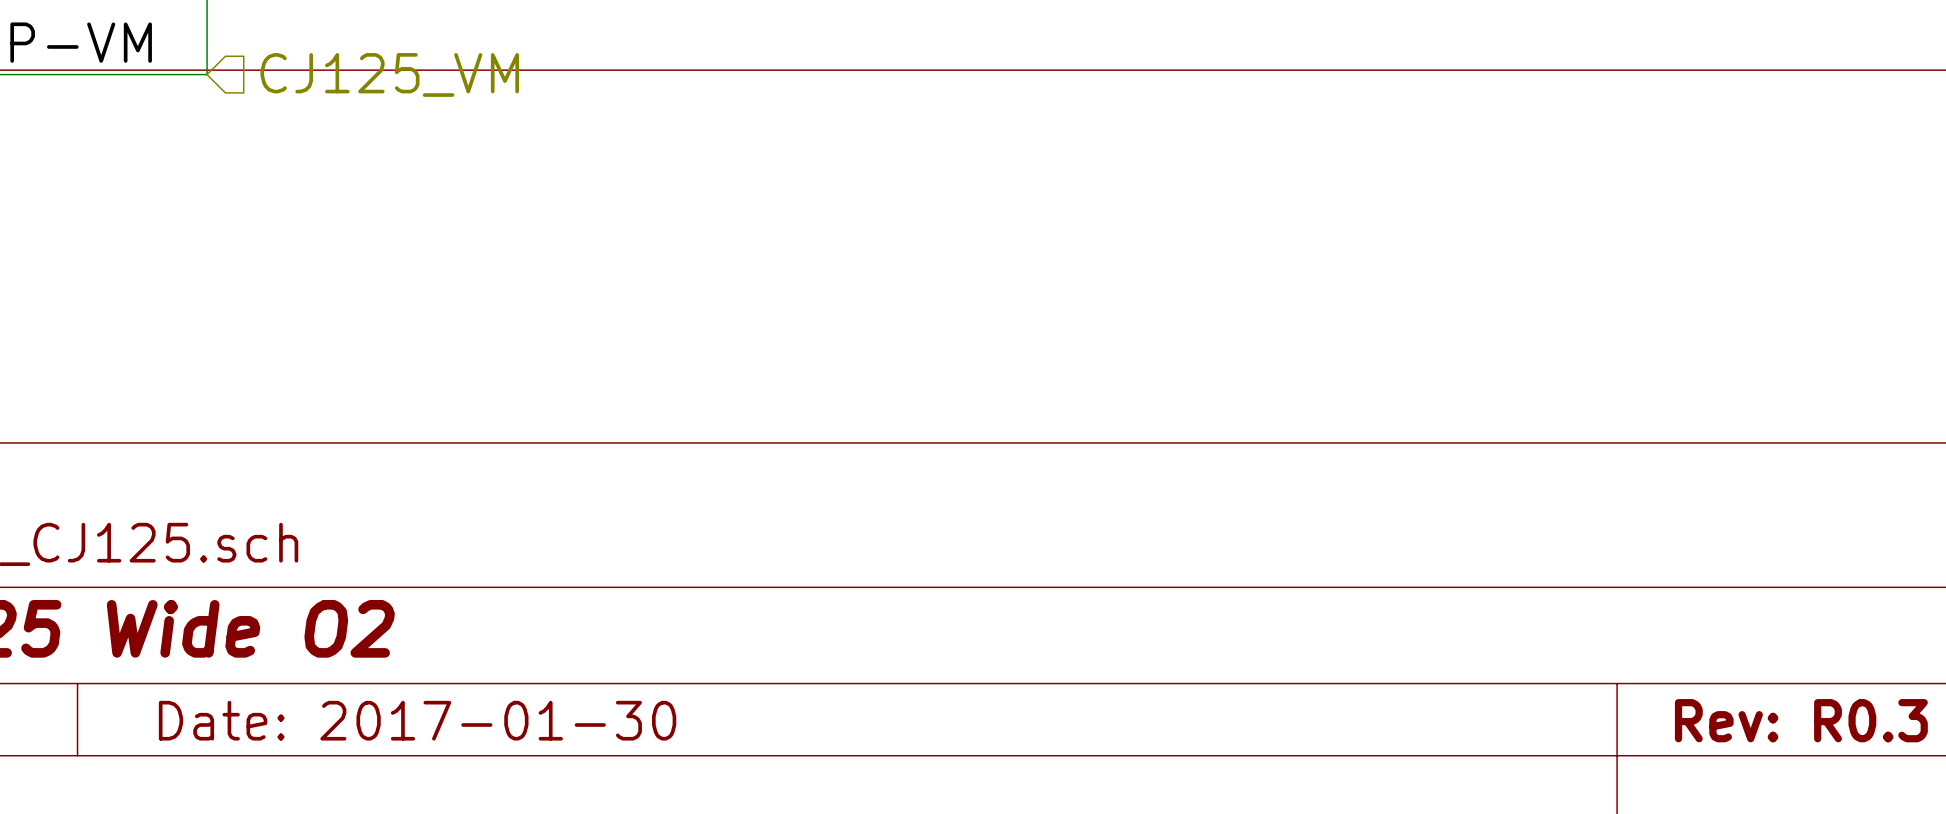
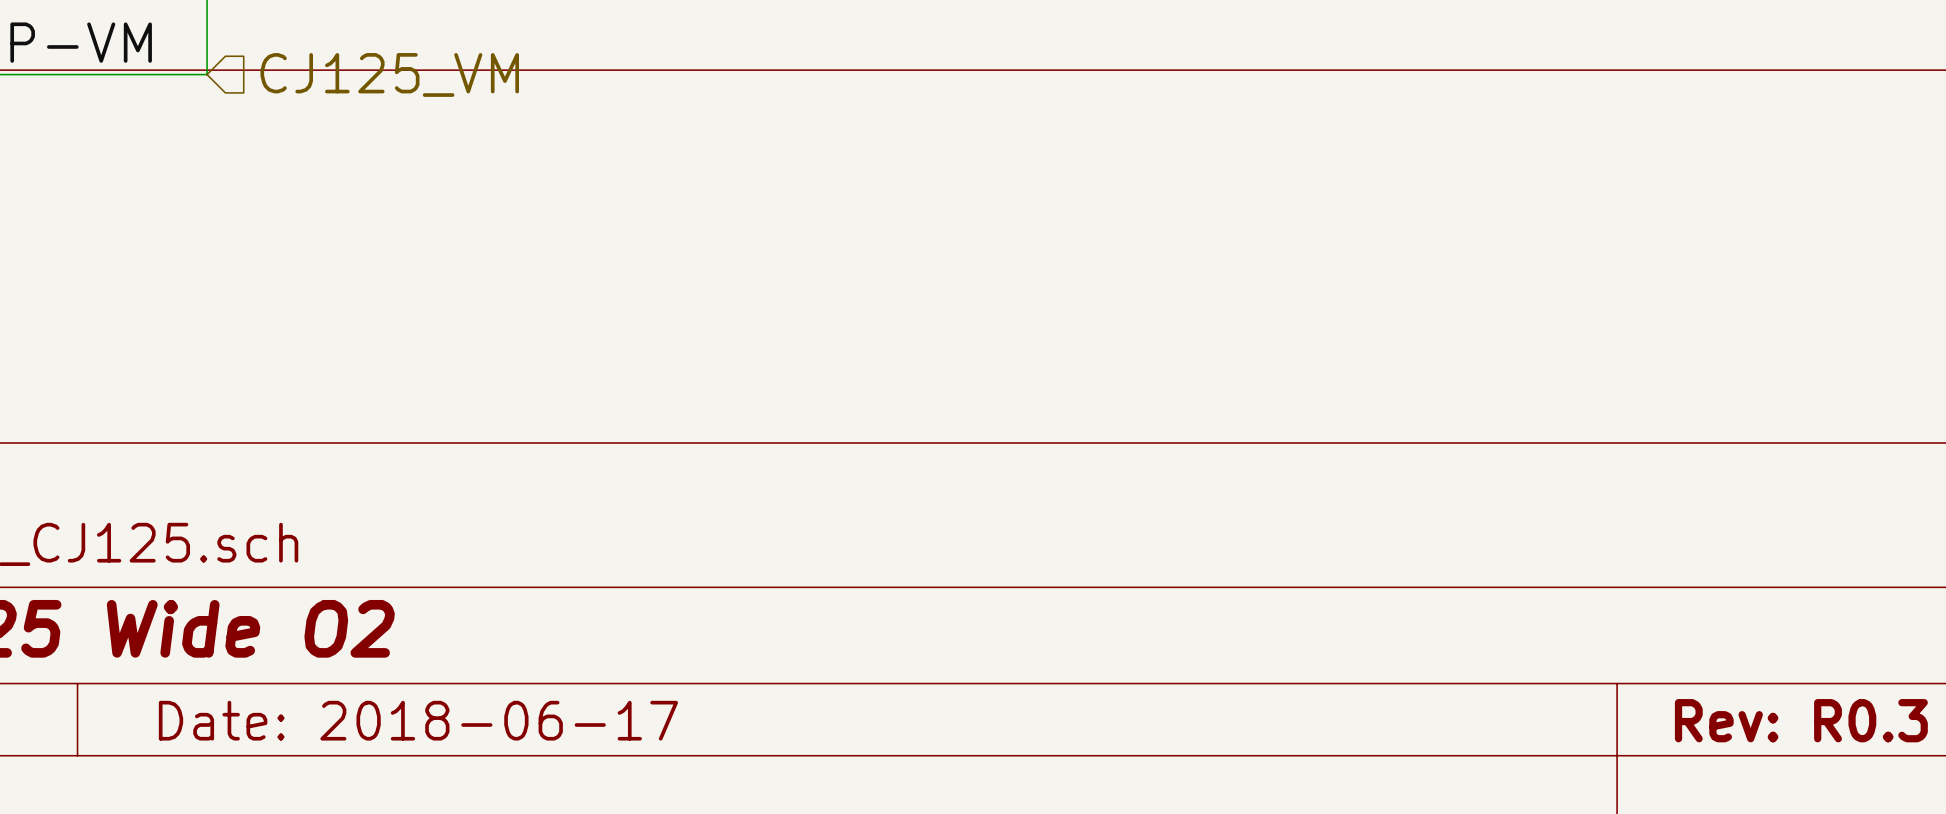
title block: Date: 2017-01-30 (417, 720) -> Date: 2018-06-17 (418, 720)

